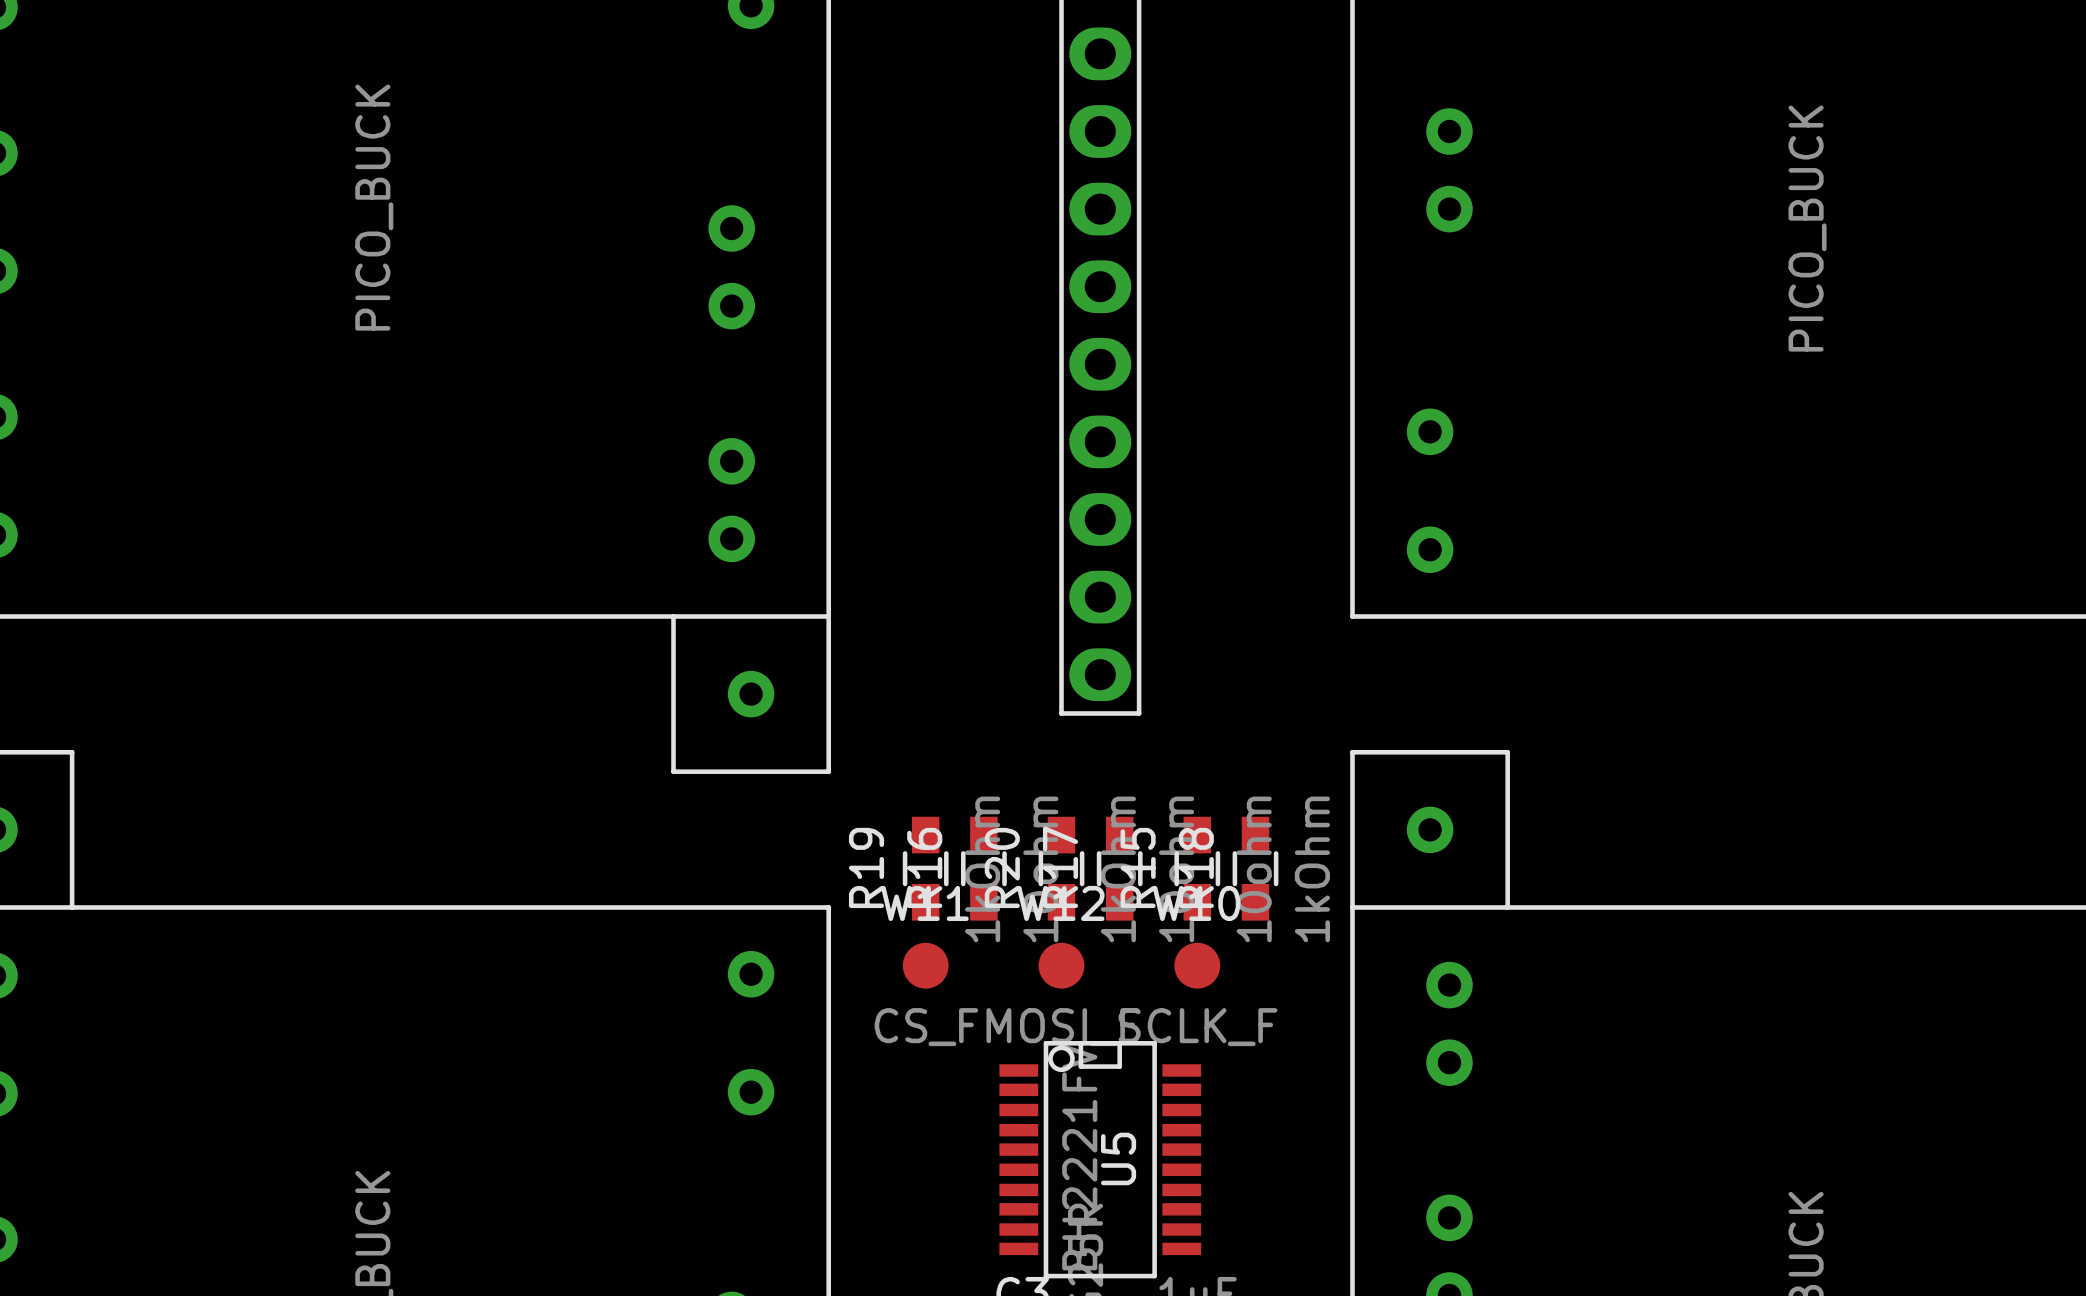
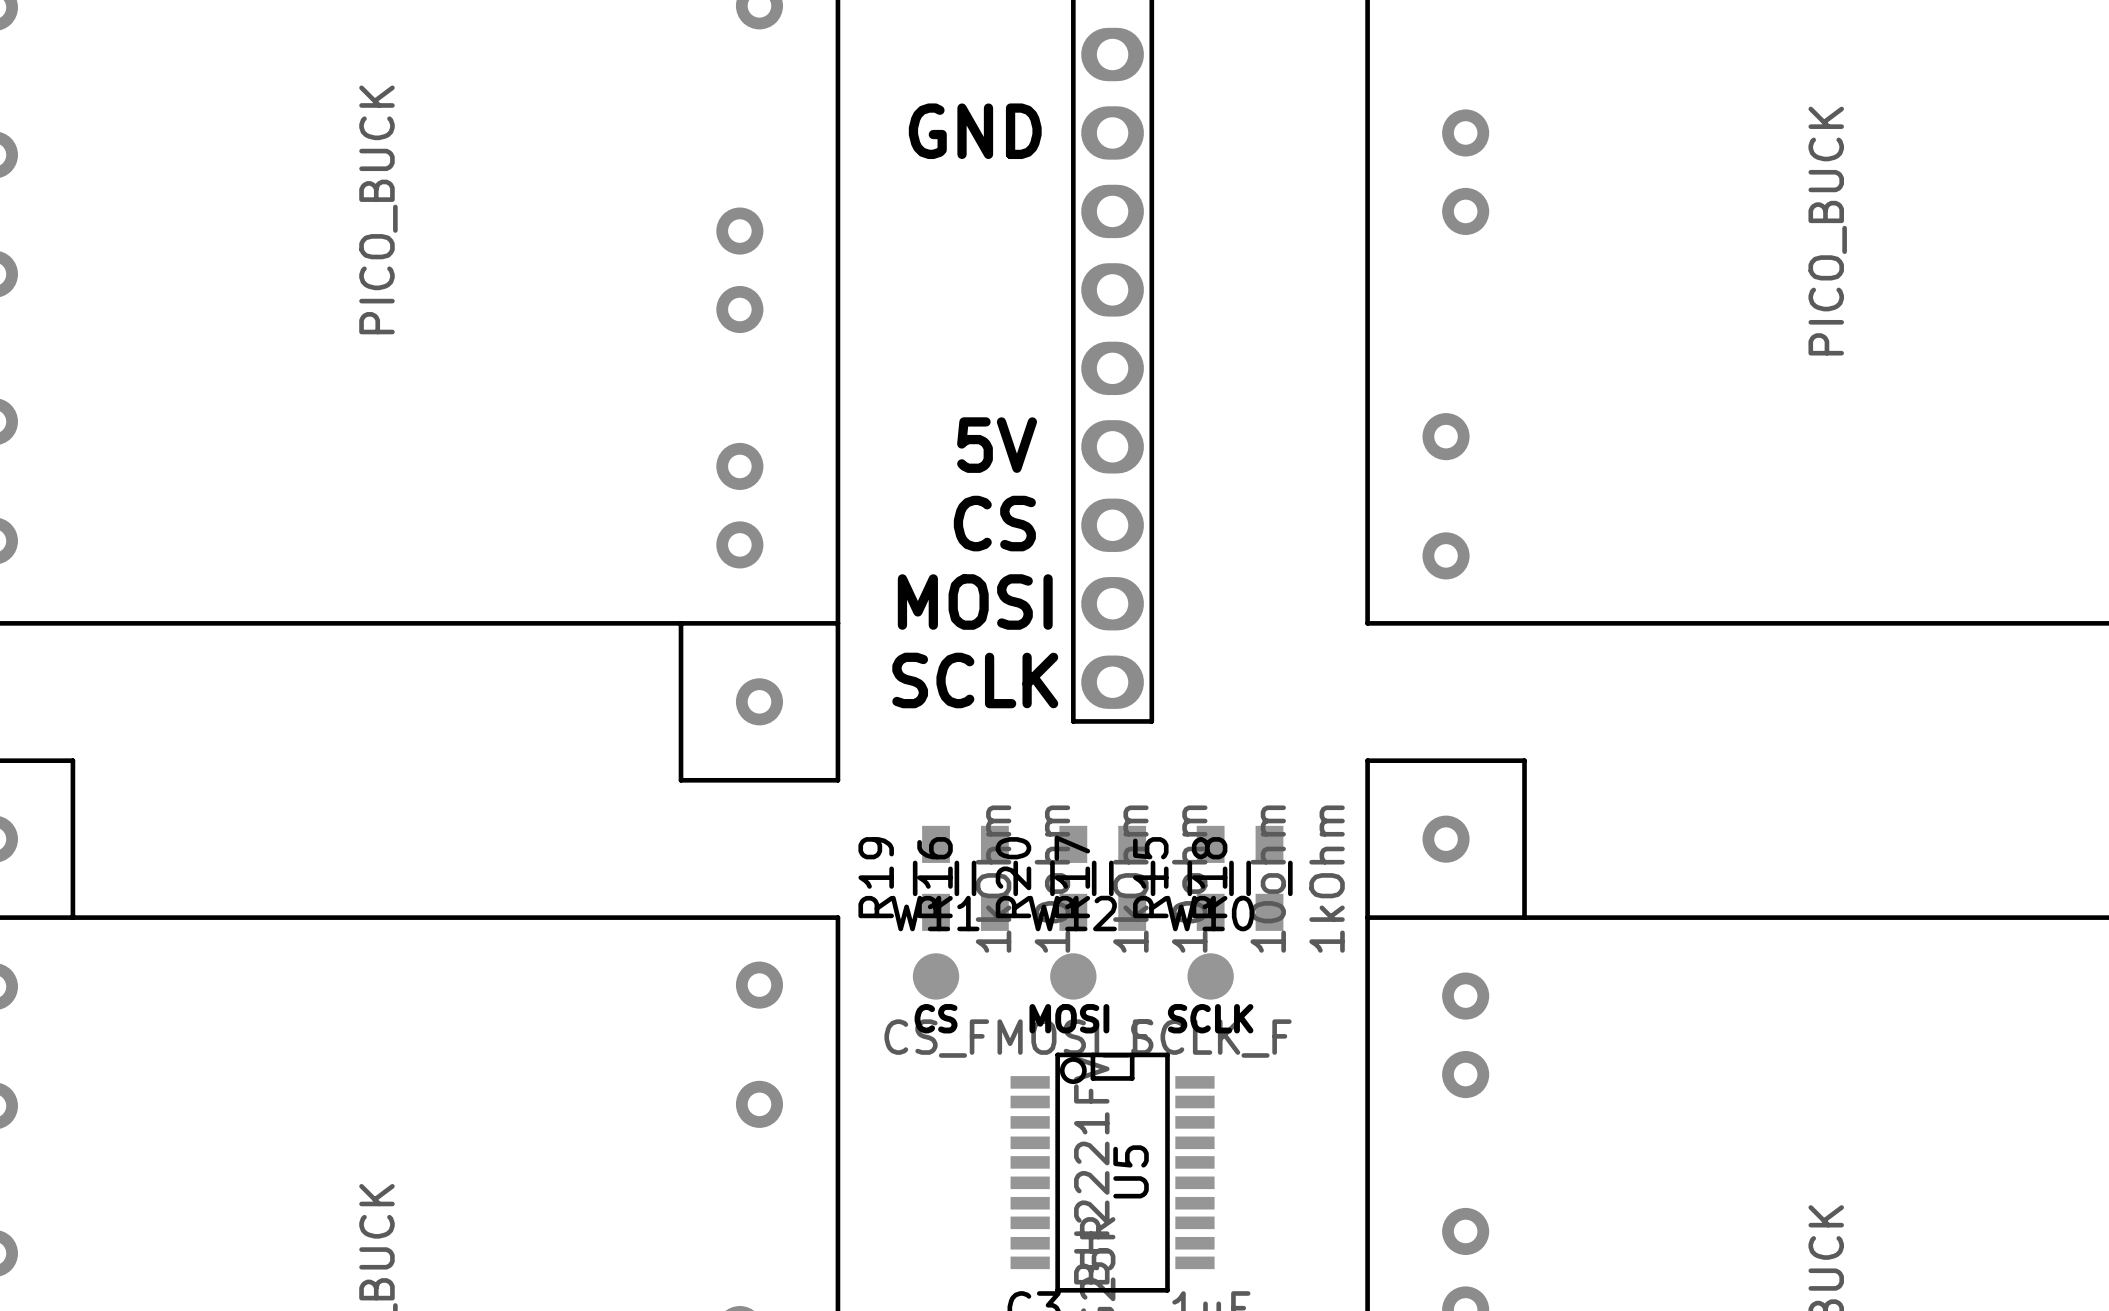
text: none -> GND (975, 131)
text: none -> 5V (997, 445)
text: none -> CS (994, 523)
text: none -> MOSI (975, 602)
text: none -> SCLK (975, 680)
text: none -> CS (936, 1018)
text: none -> MOSI (1069, 1018)
text: none -> SCLK (1210, 1018)

